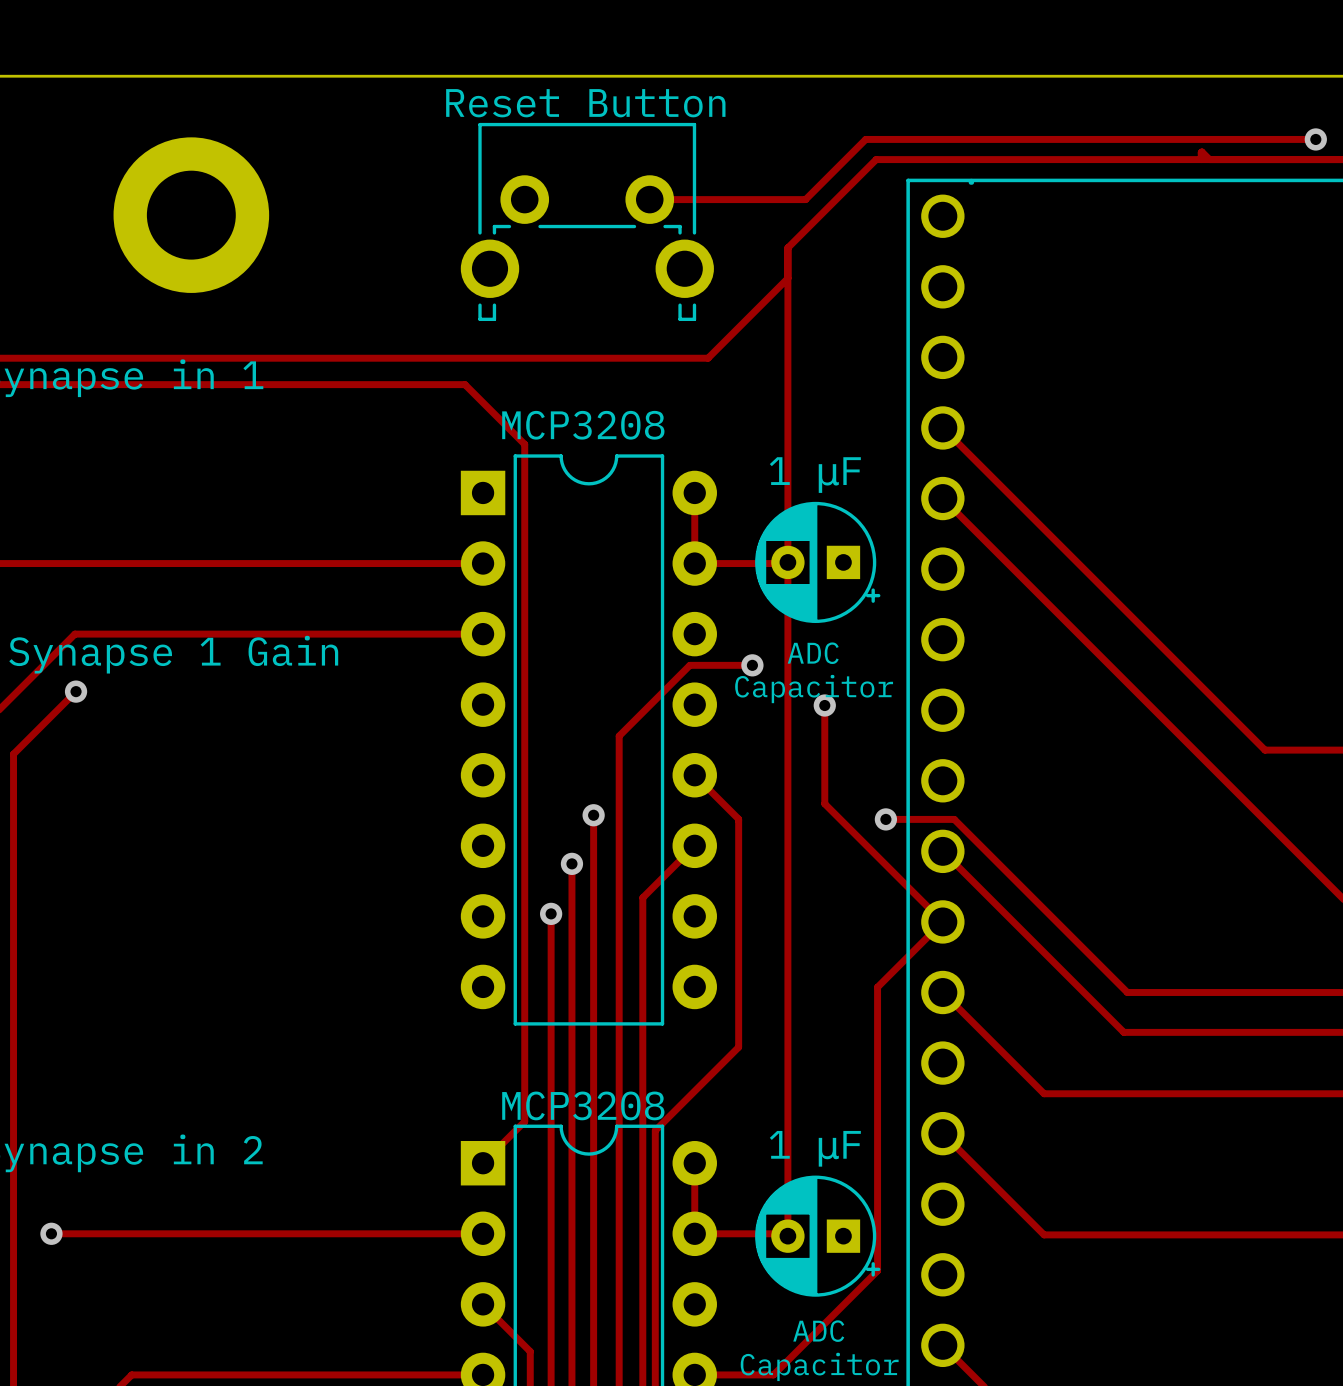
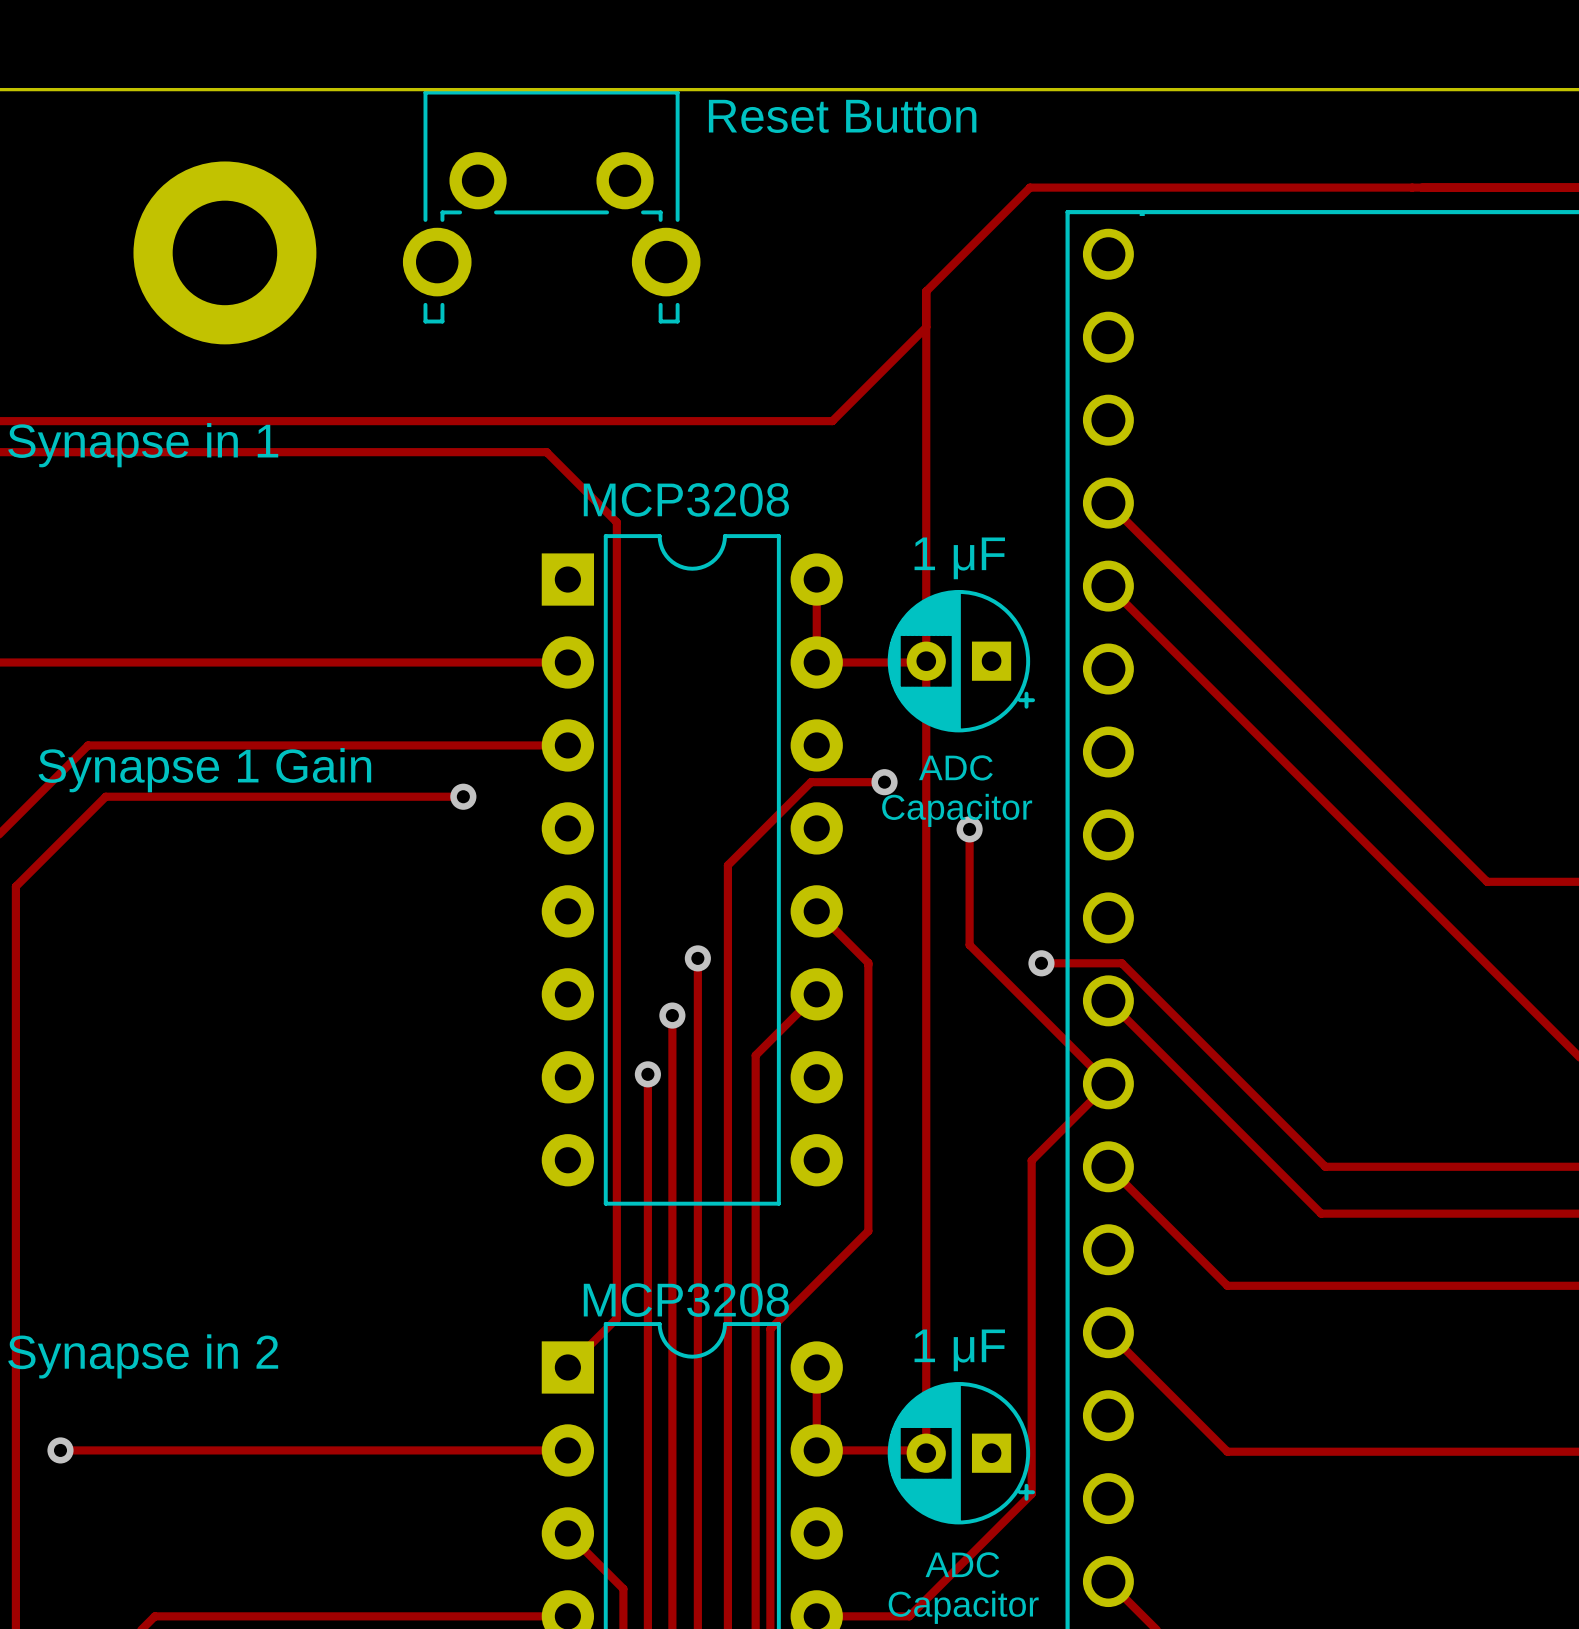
part value position: Reset Button (585, 103) -> Reset Button (842, 116)
track: (1315, 139) (865, 139) (805, 199) (649, 199) -> none
via: (1315, 139) -> none
track: (1201, 159) (1201, 151) (1209, 159) -> none
part position: (587, 221) -> (551, 207)
track: none -> (463, 796) (105, 796) (89, 813)
via: none -> (463, 796)
via: (76, 691) -> none

